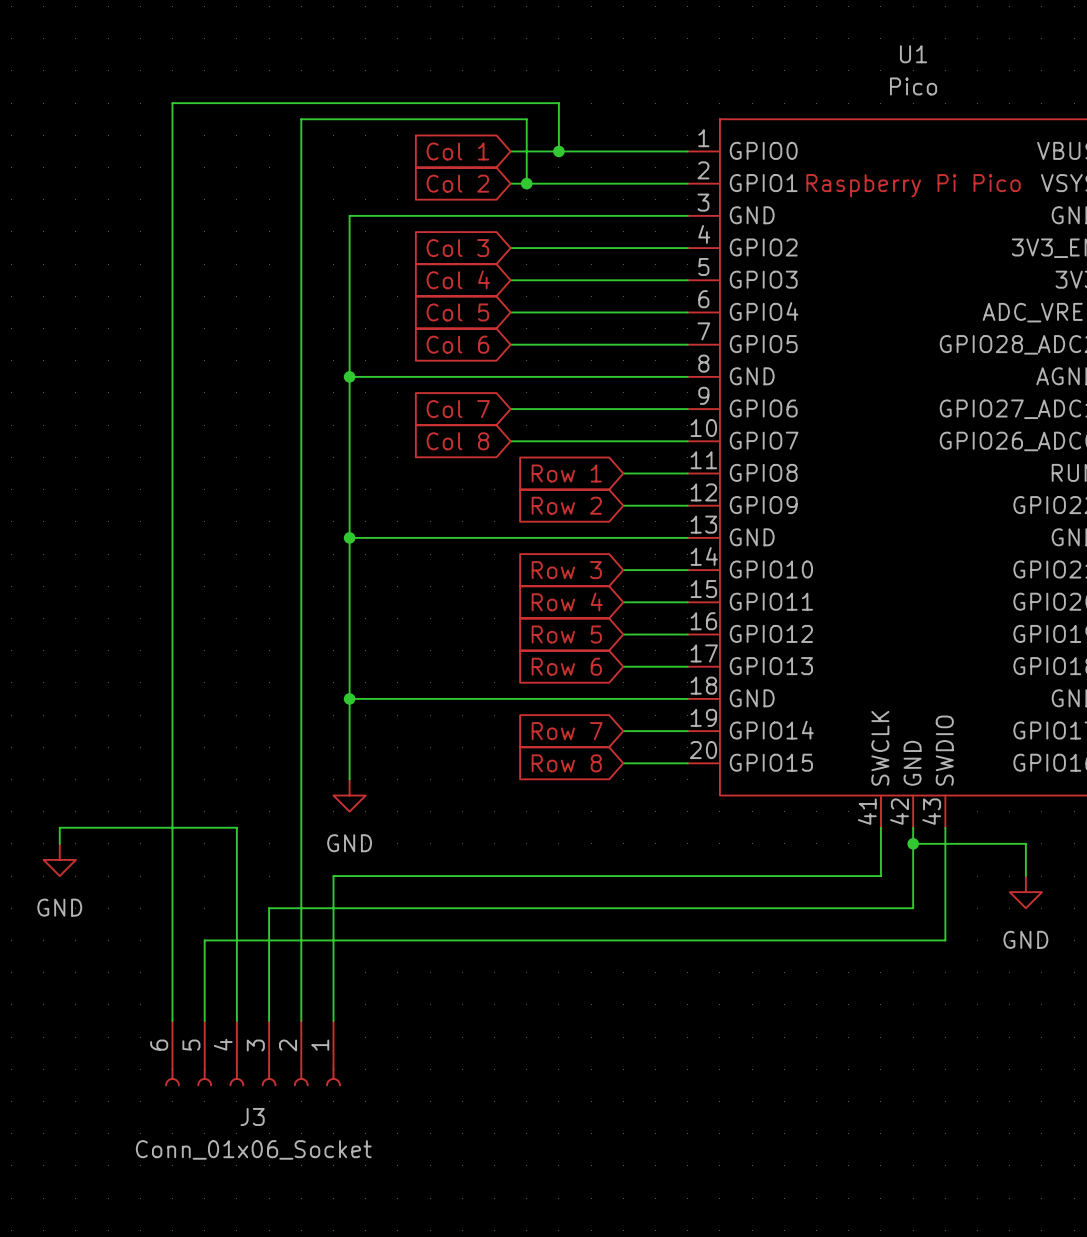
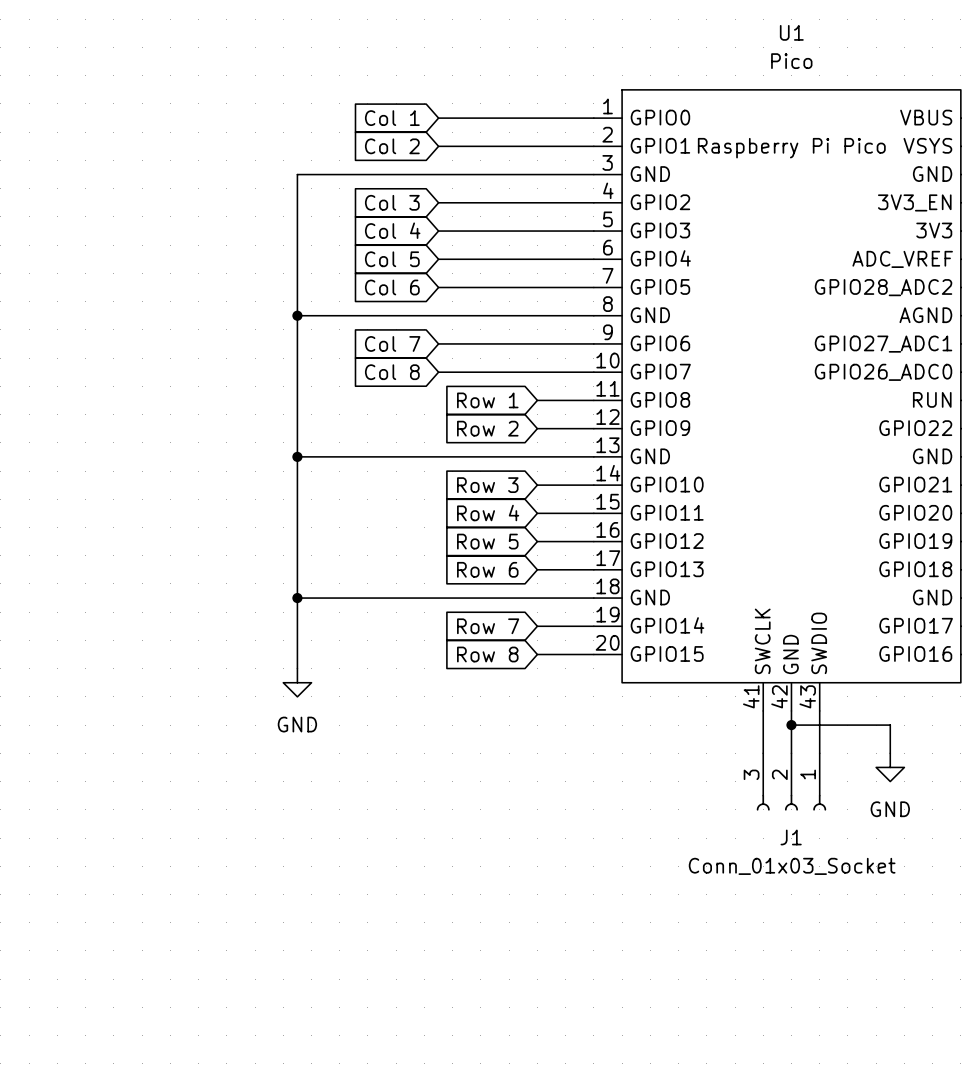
wire: (558, 151) (558, 103) (172, 103) (172, 1020) -> none
junction: (558, 151) -> none
wire: (526, 183) (526, 119) (301, 119) (301, 1020) -> none
junction: (526, 183) -> none
wire: (59, 843) (59, 827) (236, 827) (236, 1020) -> none
power symbol: GND (59, 859) -> none
wire: (880, 876) (333, 876) (333, 1020) -> none
wire: (913, 876) (913, 908) (269, 908) (269, 1020) -> none
wire: (945, 876) (945, 940) (204, 940) (204, 1020) -> none
J1: none -> Conn_01x03_Socket (791, 781)
J3: Conn_01x06_Socket (252, 1053) -> none

